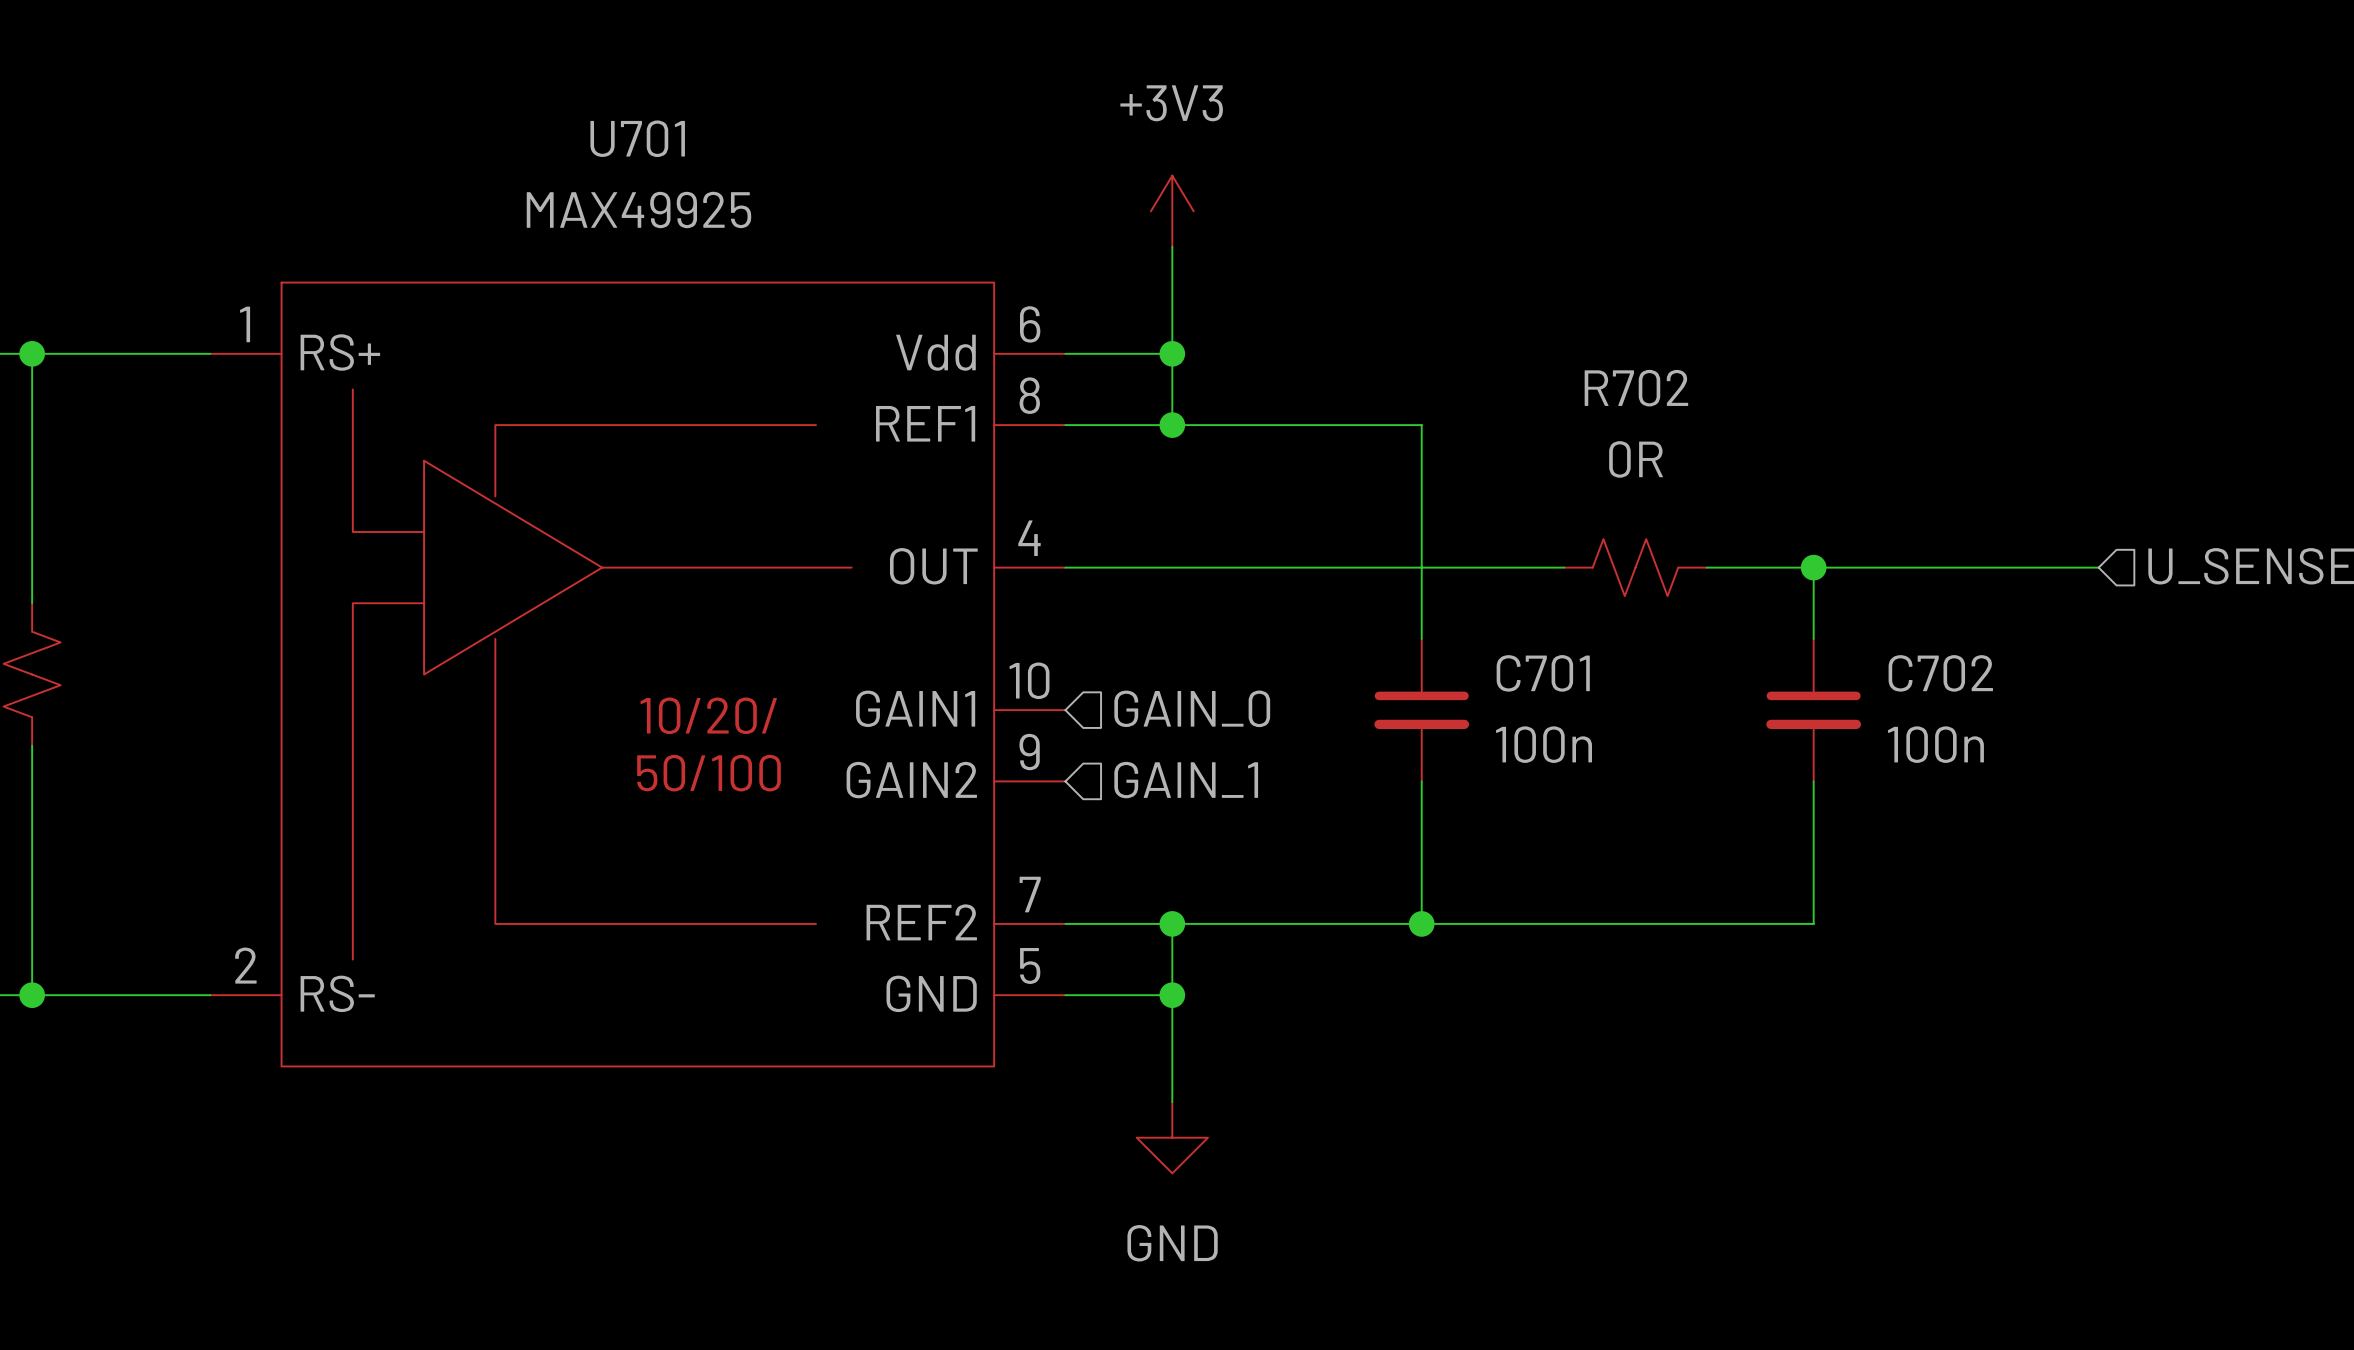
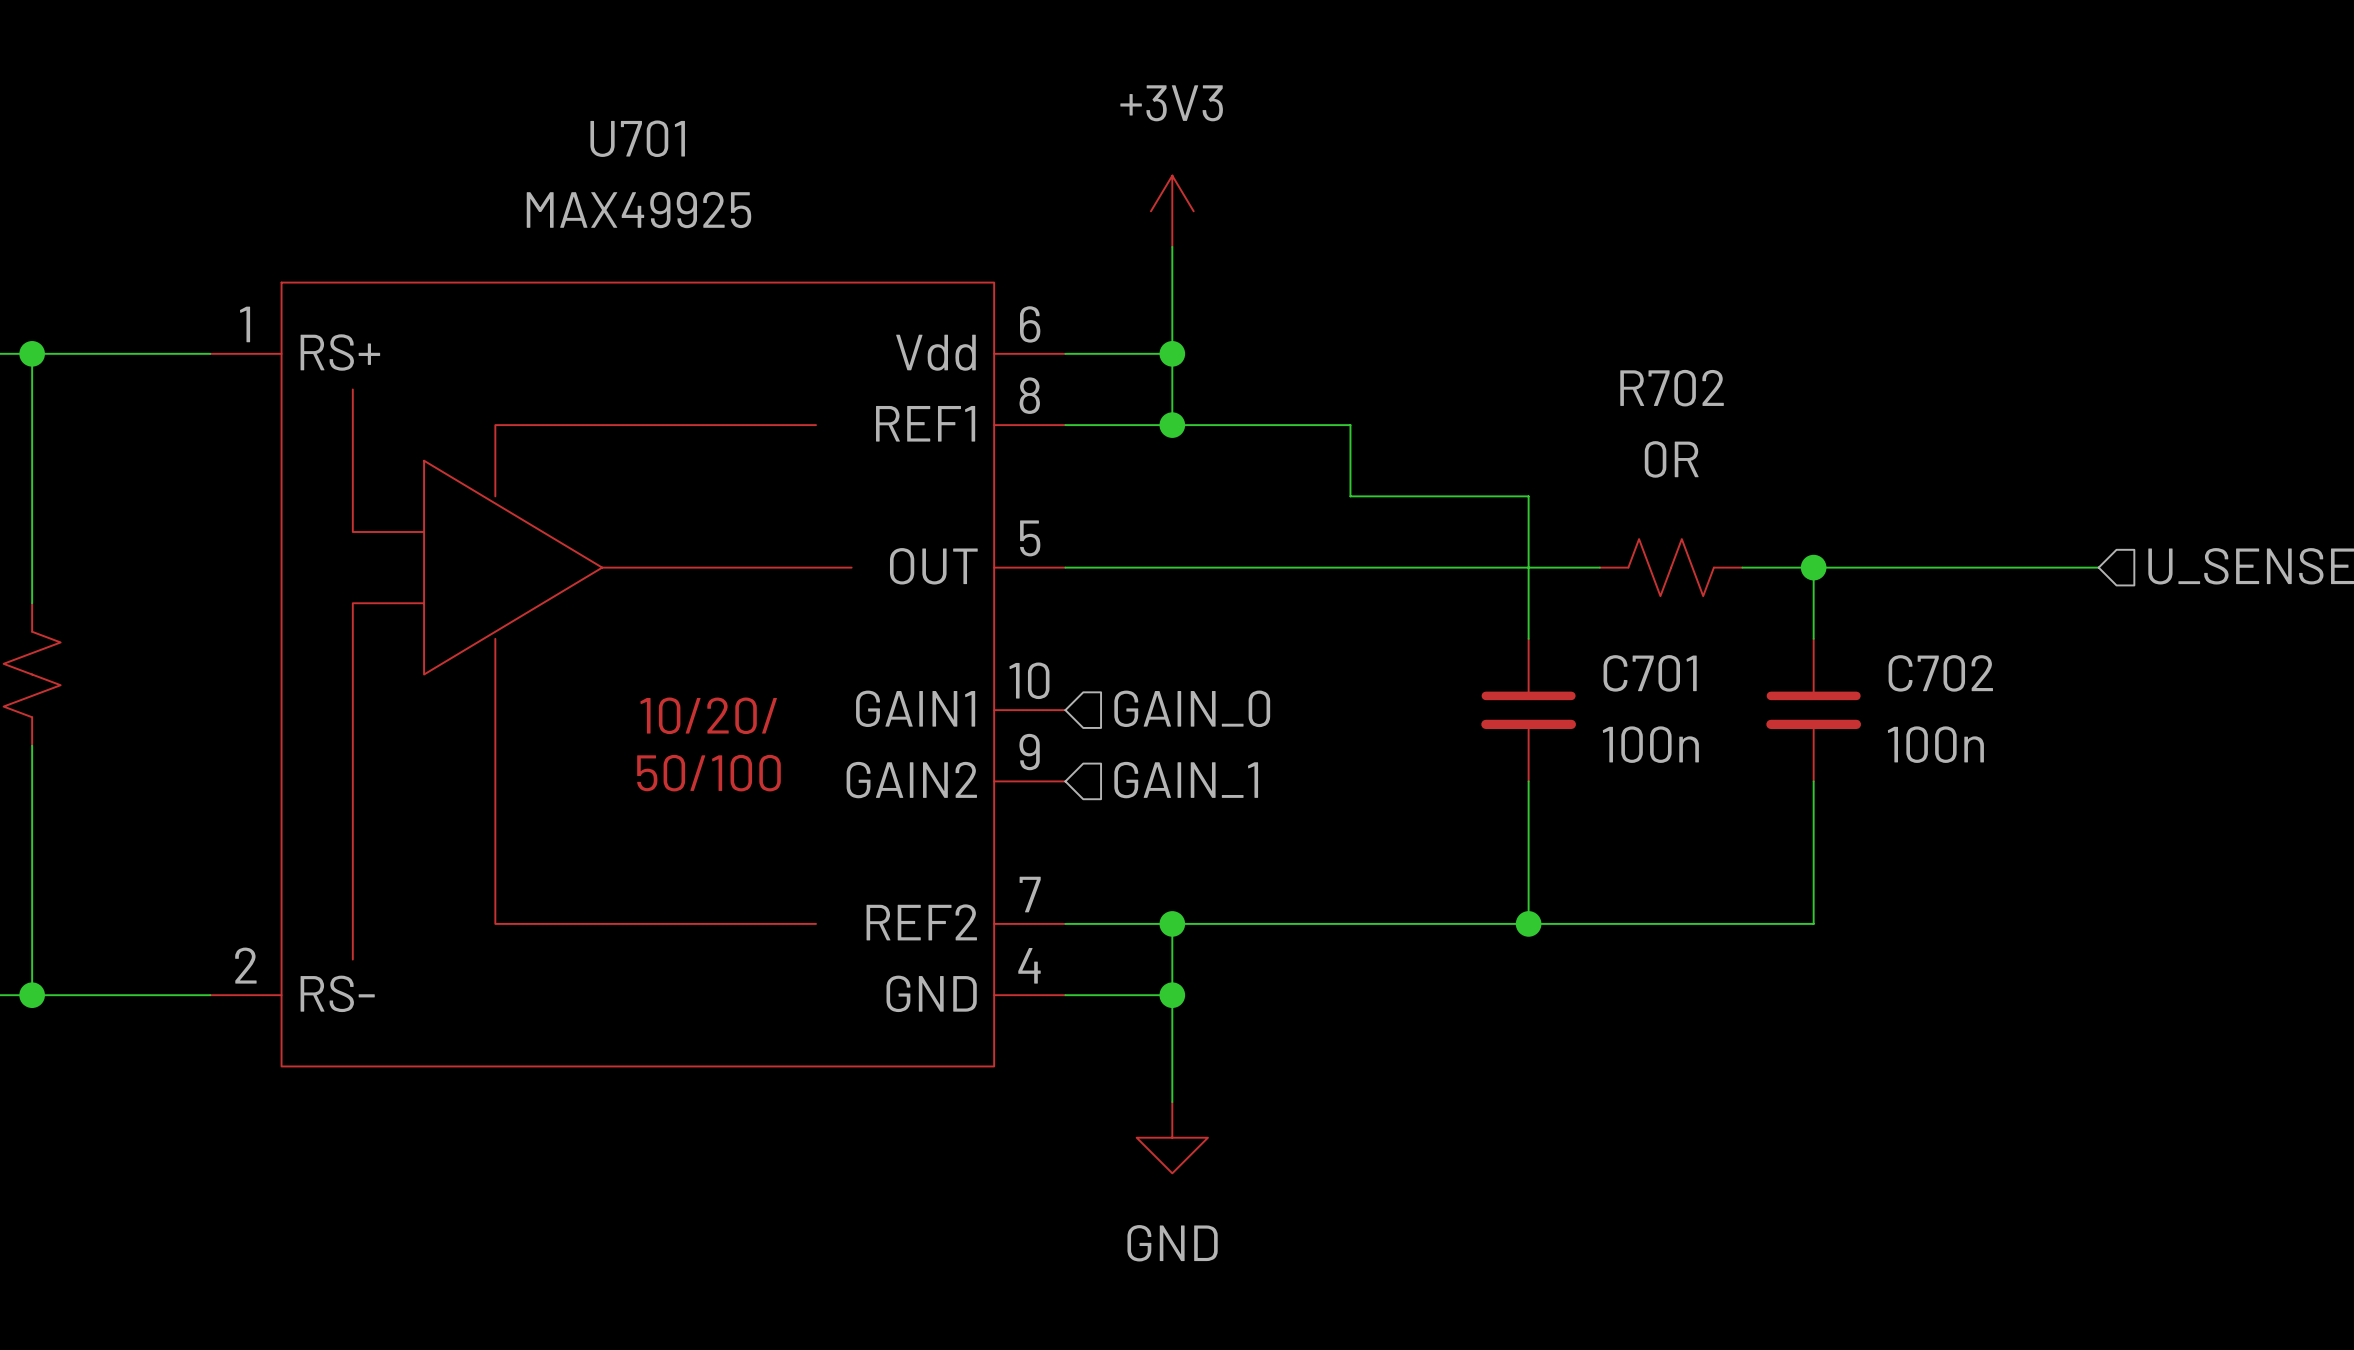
wire: (1350, 425) (1421, 425) (1421, 638) -> (1350, 425) (1350, 496) (1528, 496) (1528, 638)
U701 pin number: 4 (1029, 538) -> 5 (1030, 538)
R702 position: (1635, 567) -> (1671, 567)
C701 position: (1421, 710) -> (1528, 710)
wire: (1421, 781) (1421, 923) -> (1528, 781) (1528, 923)
junction position: (1421, 923) -> (1528, 923)
U701 pin number: 5 (1030, 965) -> 4 (1029, 965)

